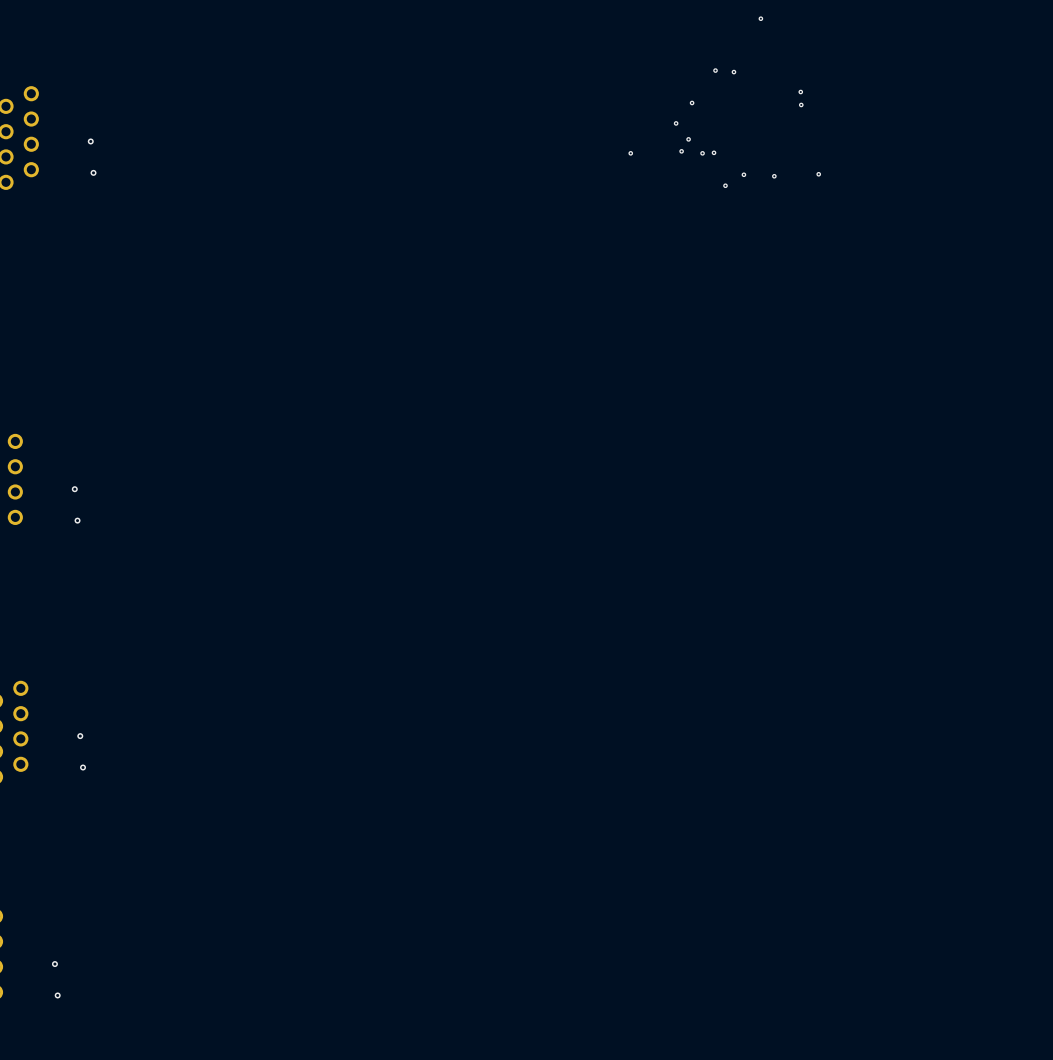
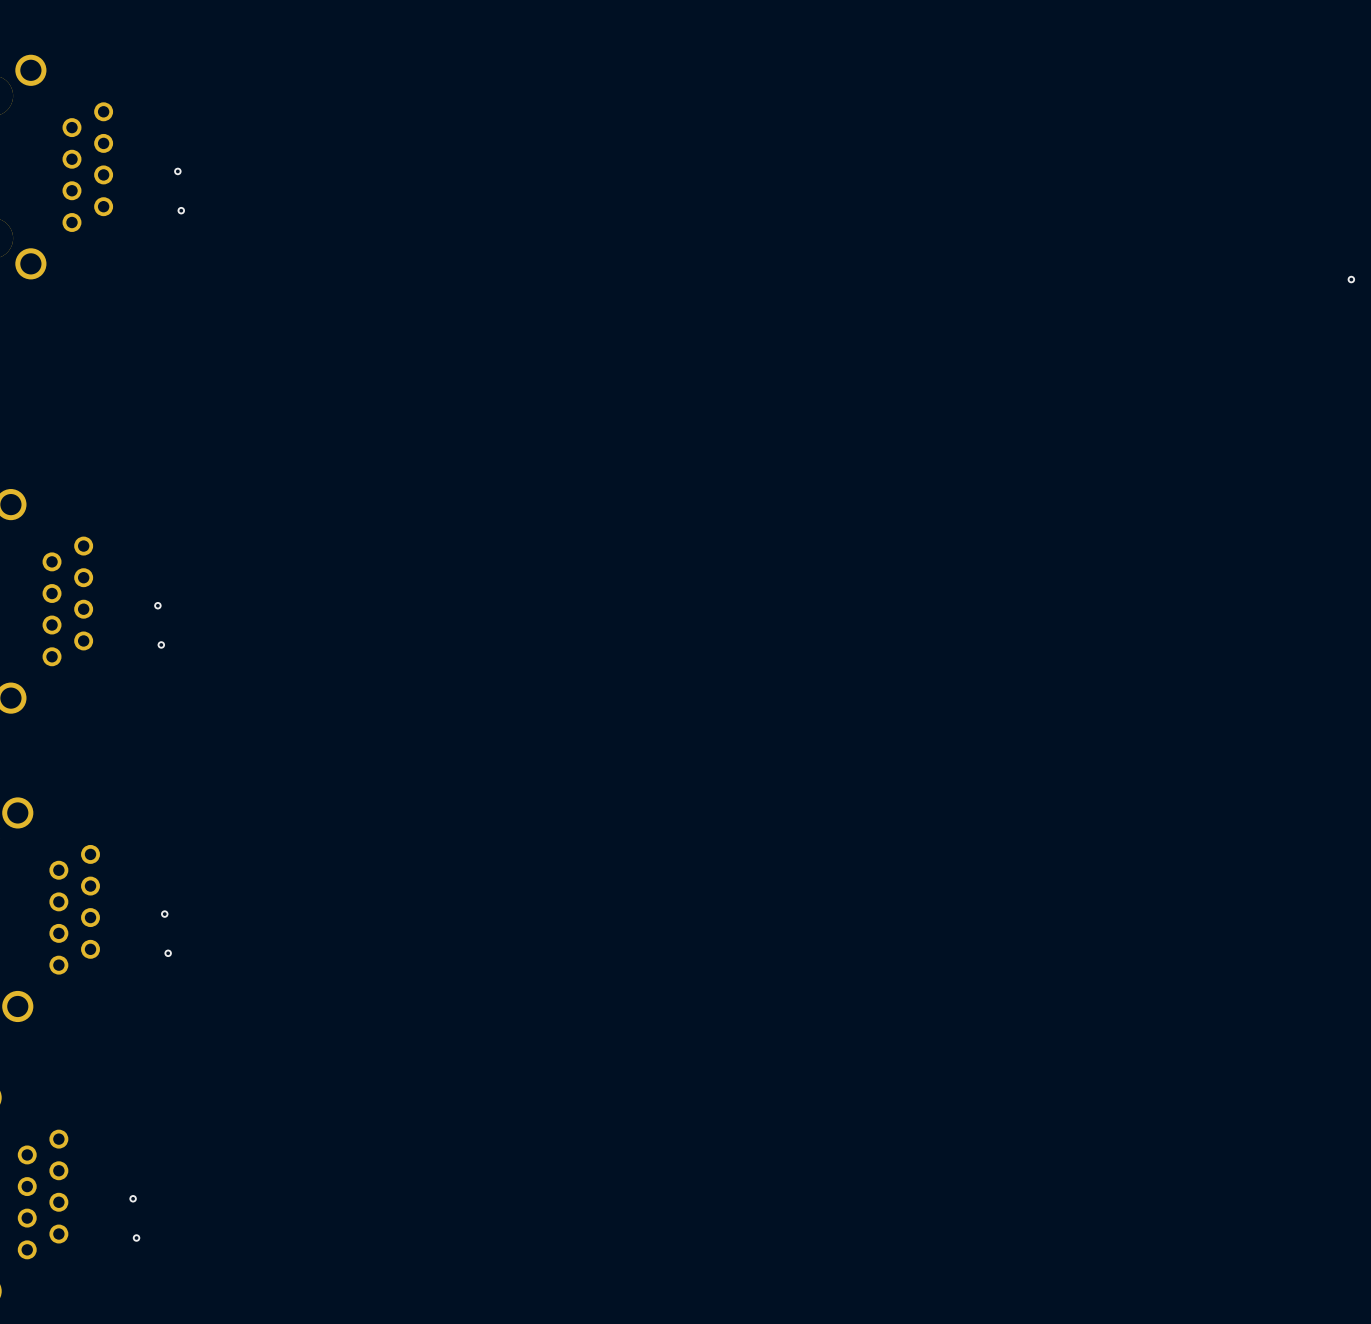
via: (760, 18) -> none
via: (715, 70) -> none
via: (733, 72) -> none
via: (800, 92) -> none
via: (692, 102) -> none
via: (801, 104) -> none
via: (676, 123) -> none
via: (688, 139) -> none
via: (681, 151) -> none
via: (714, 152) -> none
via: (630, 153) -> none
via: (702, 153) -> none
via: (743, 174) -> none
via: (818, 174) -> none
via: (774, 176) -> none
via: (725, 185) -> none
via: none -> (1351, 279)

